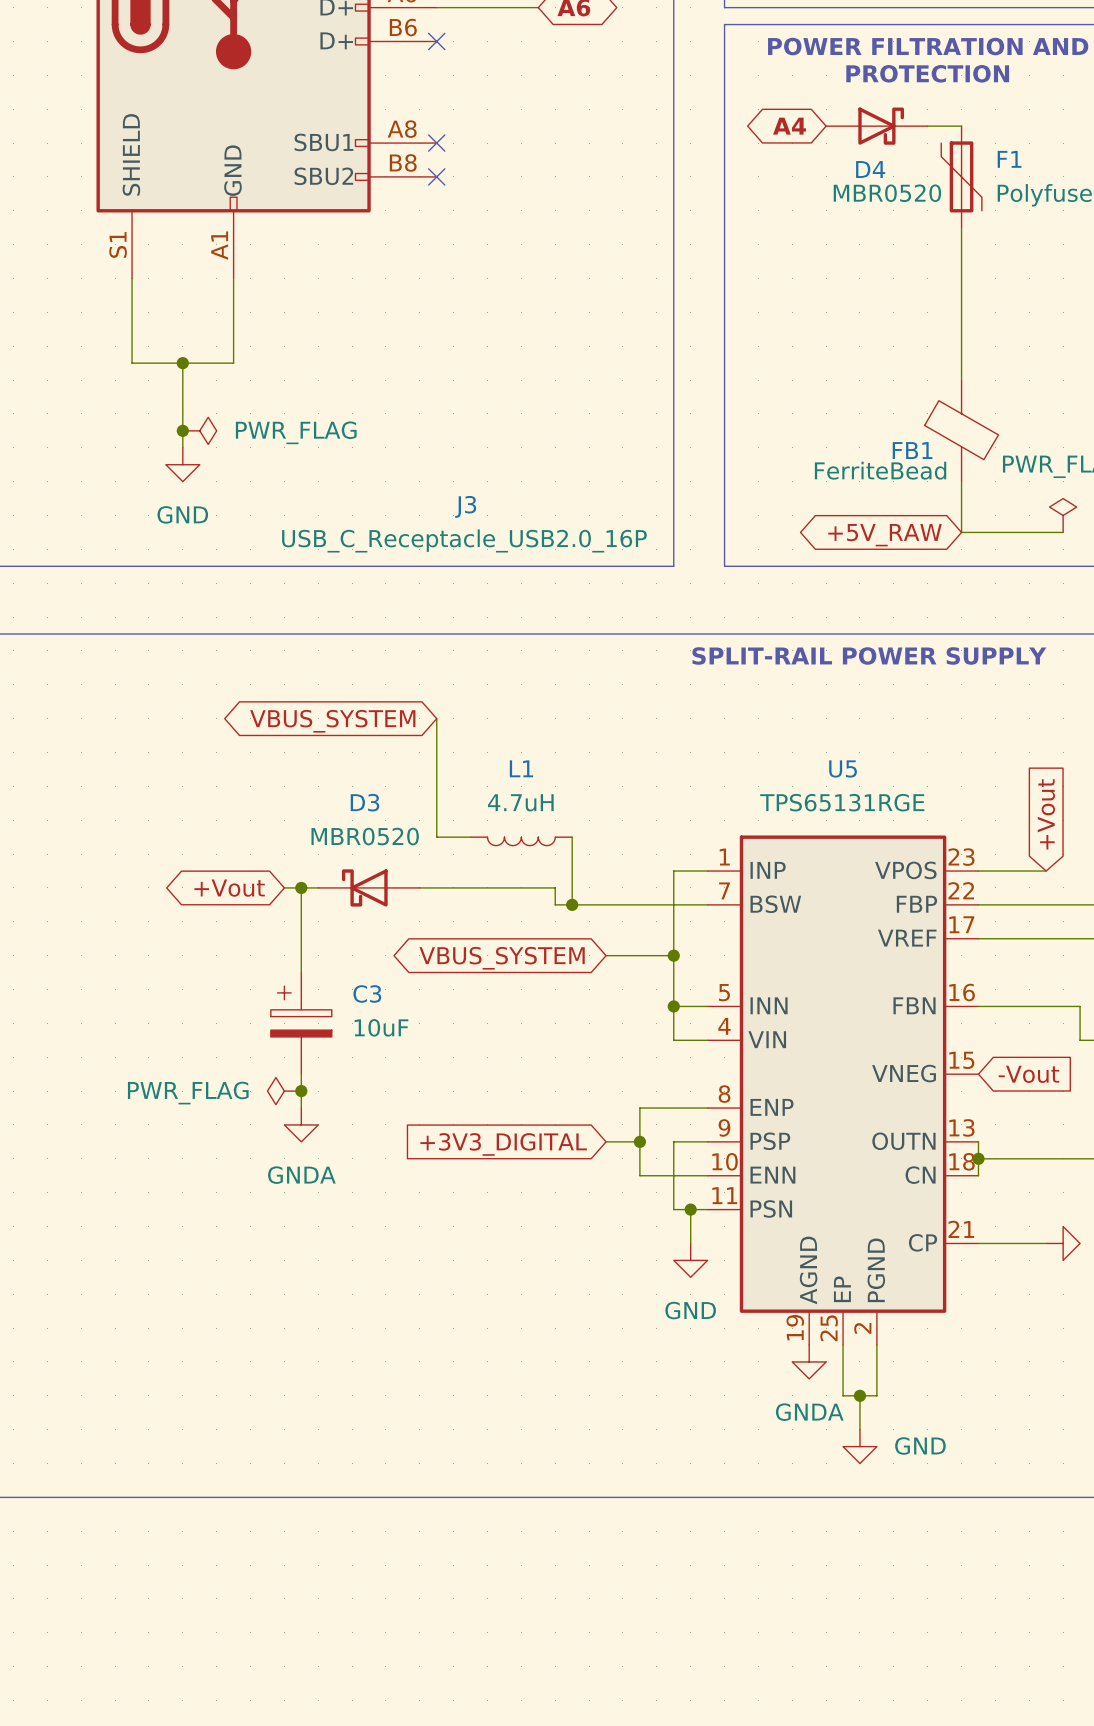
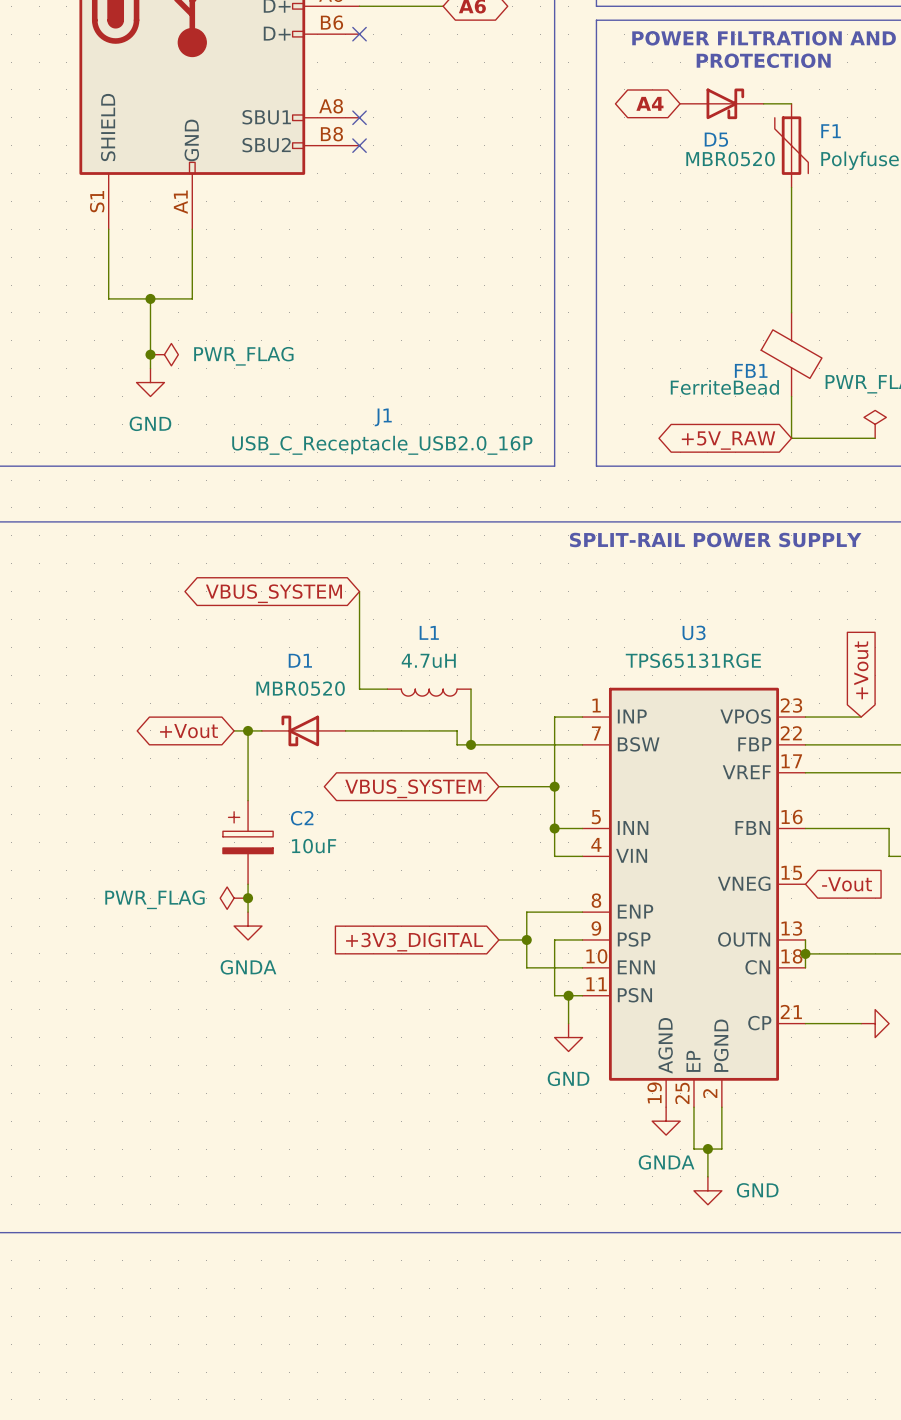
D4 name: D4 (870, 169) -> D5 (716, 139)
J3 name: J3 (465, 506) -> J1 (383, 417)
U5 name: U5 (843, 768) -> U3 (694, 632)
D3 name: D3 (365, 802) -> D1 (300, 660)
C3 name: C3 (367, 993) -> C2 (302, 818)

